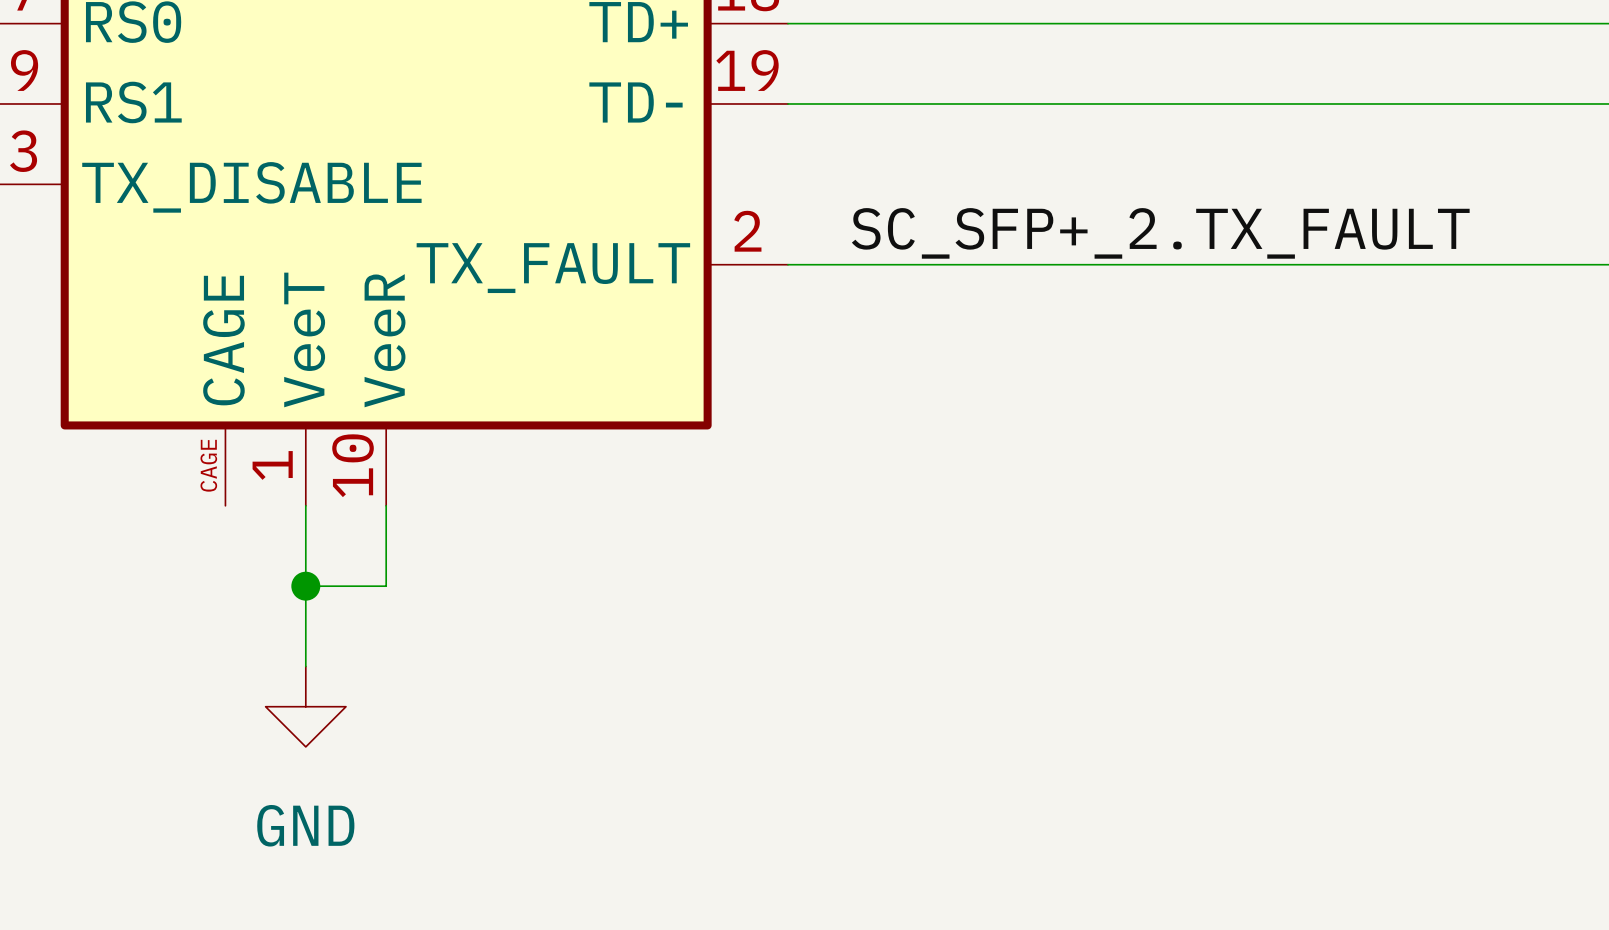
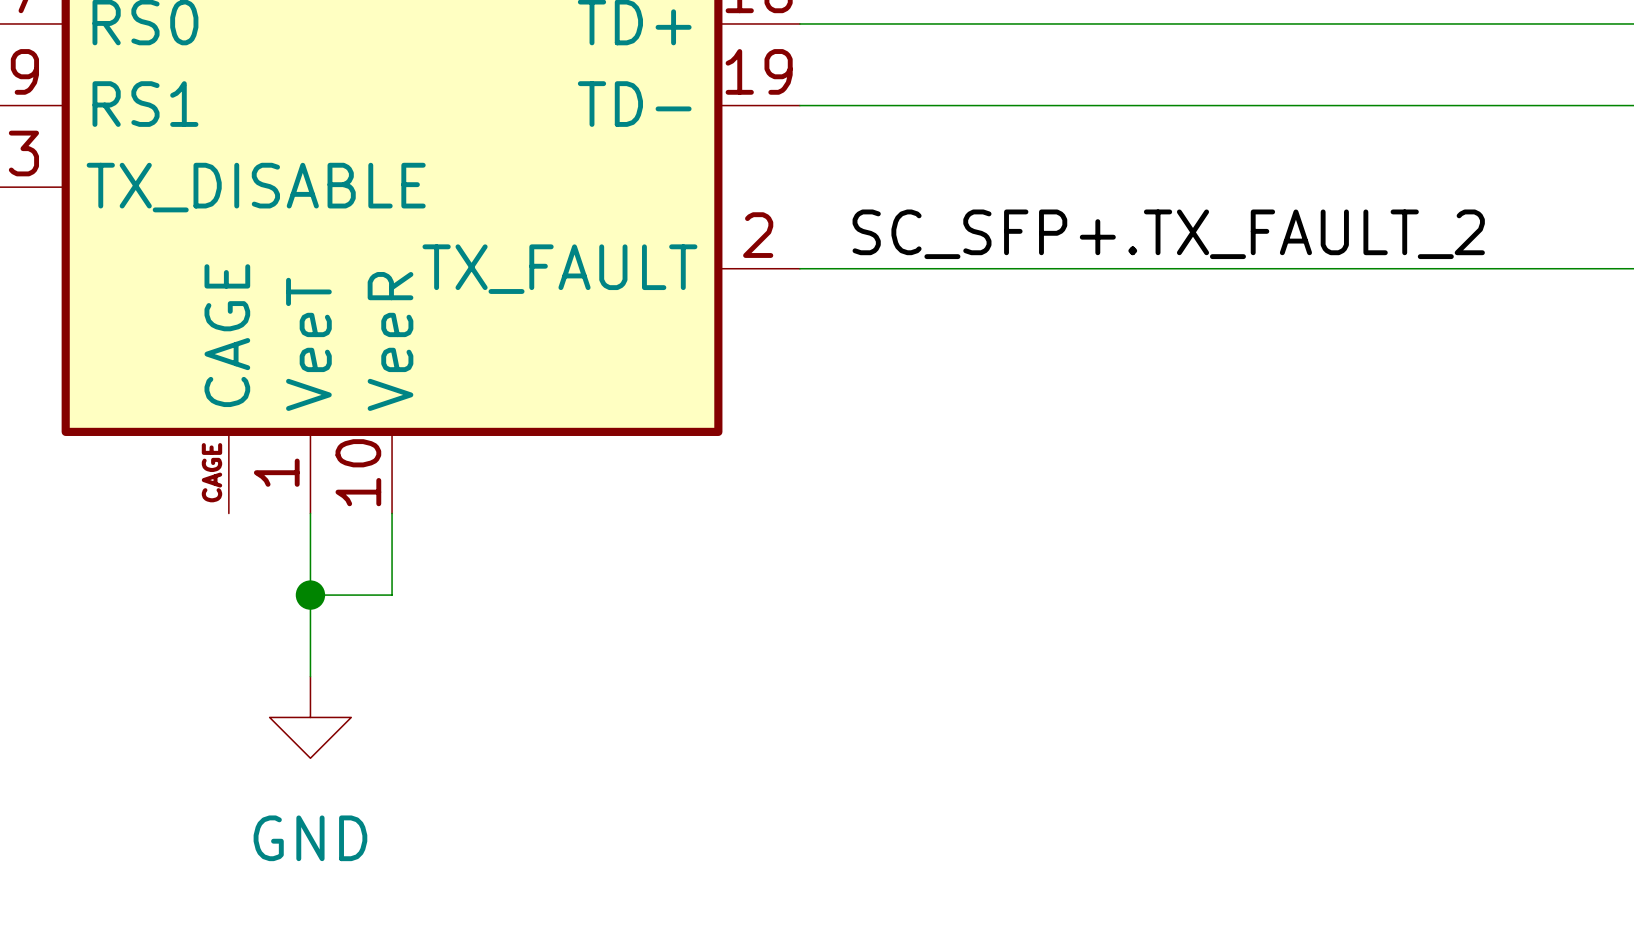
label: SC_SFP+_2.TX_FAULT (1160, 233) -> SC_SFP+.TX_FAULT_2 (1168, 234)

